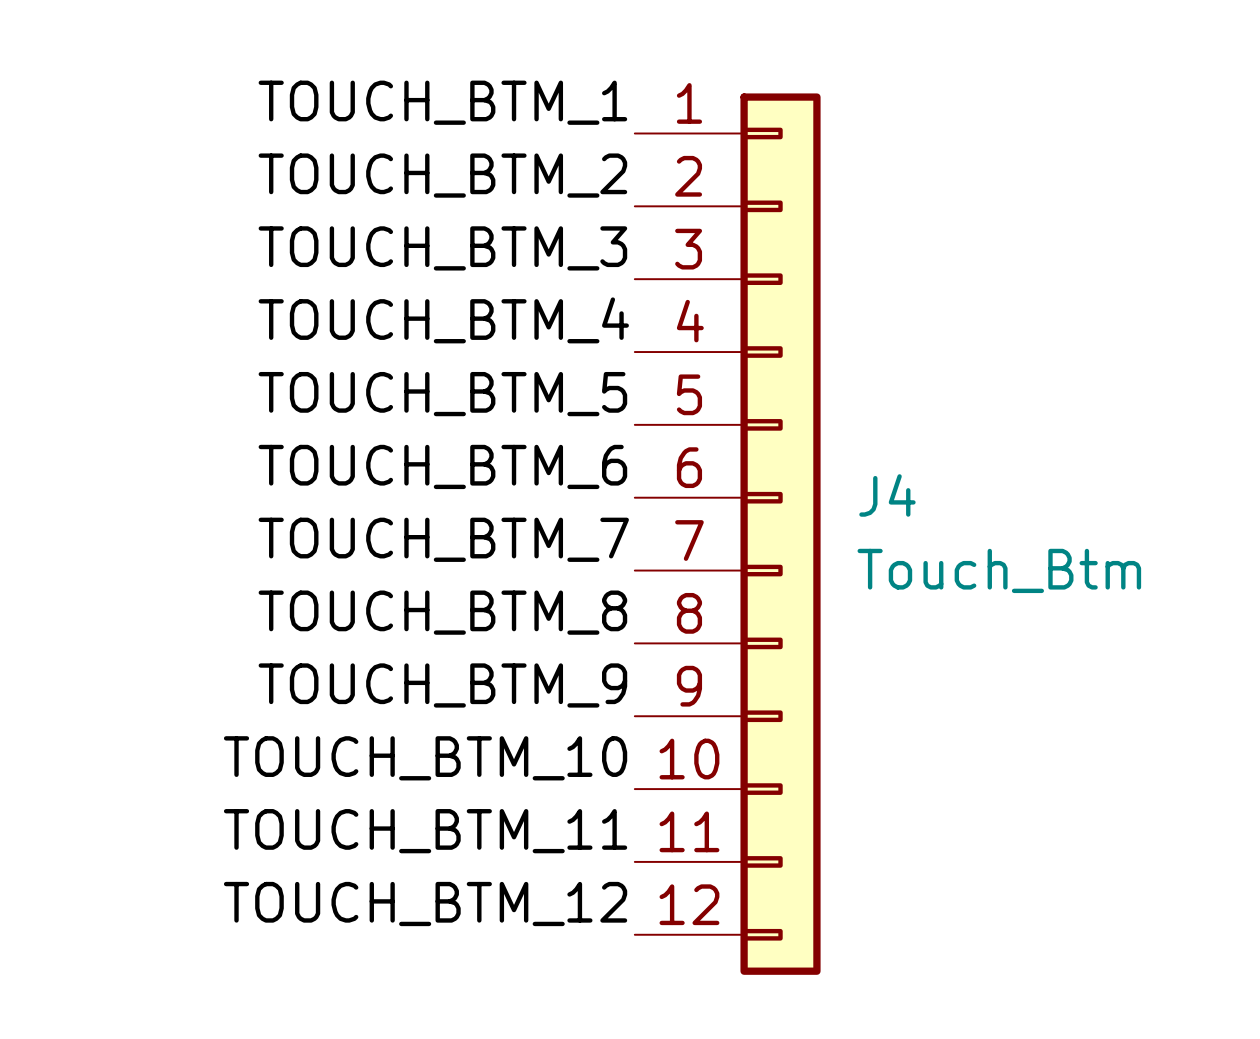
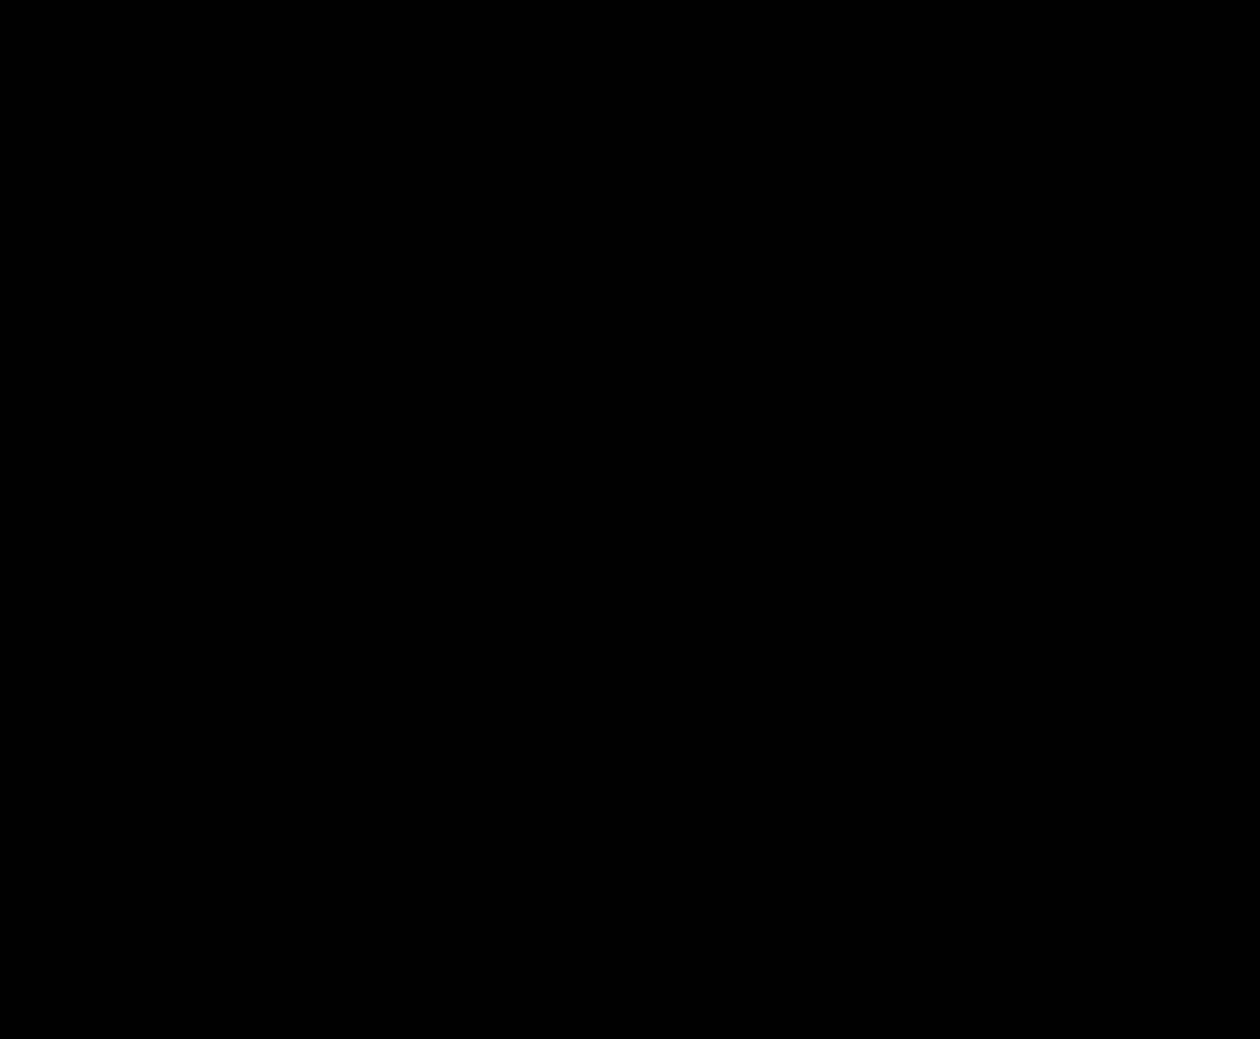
label: TOUCH_BTM_1 (442, 102) -> none
label: TOUCH_BTM_2 (442, 175) -> none
label: TOUCH_BTM_3 (442, 248) -> none
label: TOUCH_BTM_4 (443, 320) -> none
label: TOUCH_BTM_5 (442, 394) -> none
label: TOUCH_BTM_6 (442, 466) -> none
J4: Touch_Btm (727, 534) -> none
label: TOUCH_BTM_7 (443, 539) -> none
label: TOUCH_BTM_8 (442, 612) -> none
label: TOUCH_BTM_9 (442, 685) -> none
label: TOUCH_BTM_10 (425, 758) -> none
label: TOUCH_BTM_11 (425, 831) -> none
label: TOUCH_BTM_12 (425, 904) -> none

